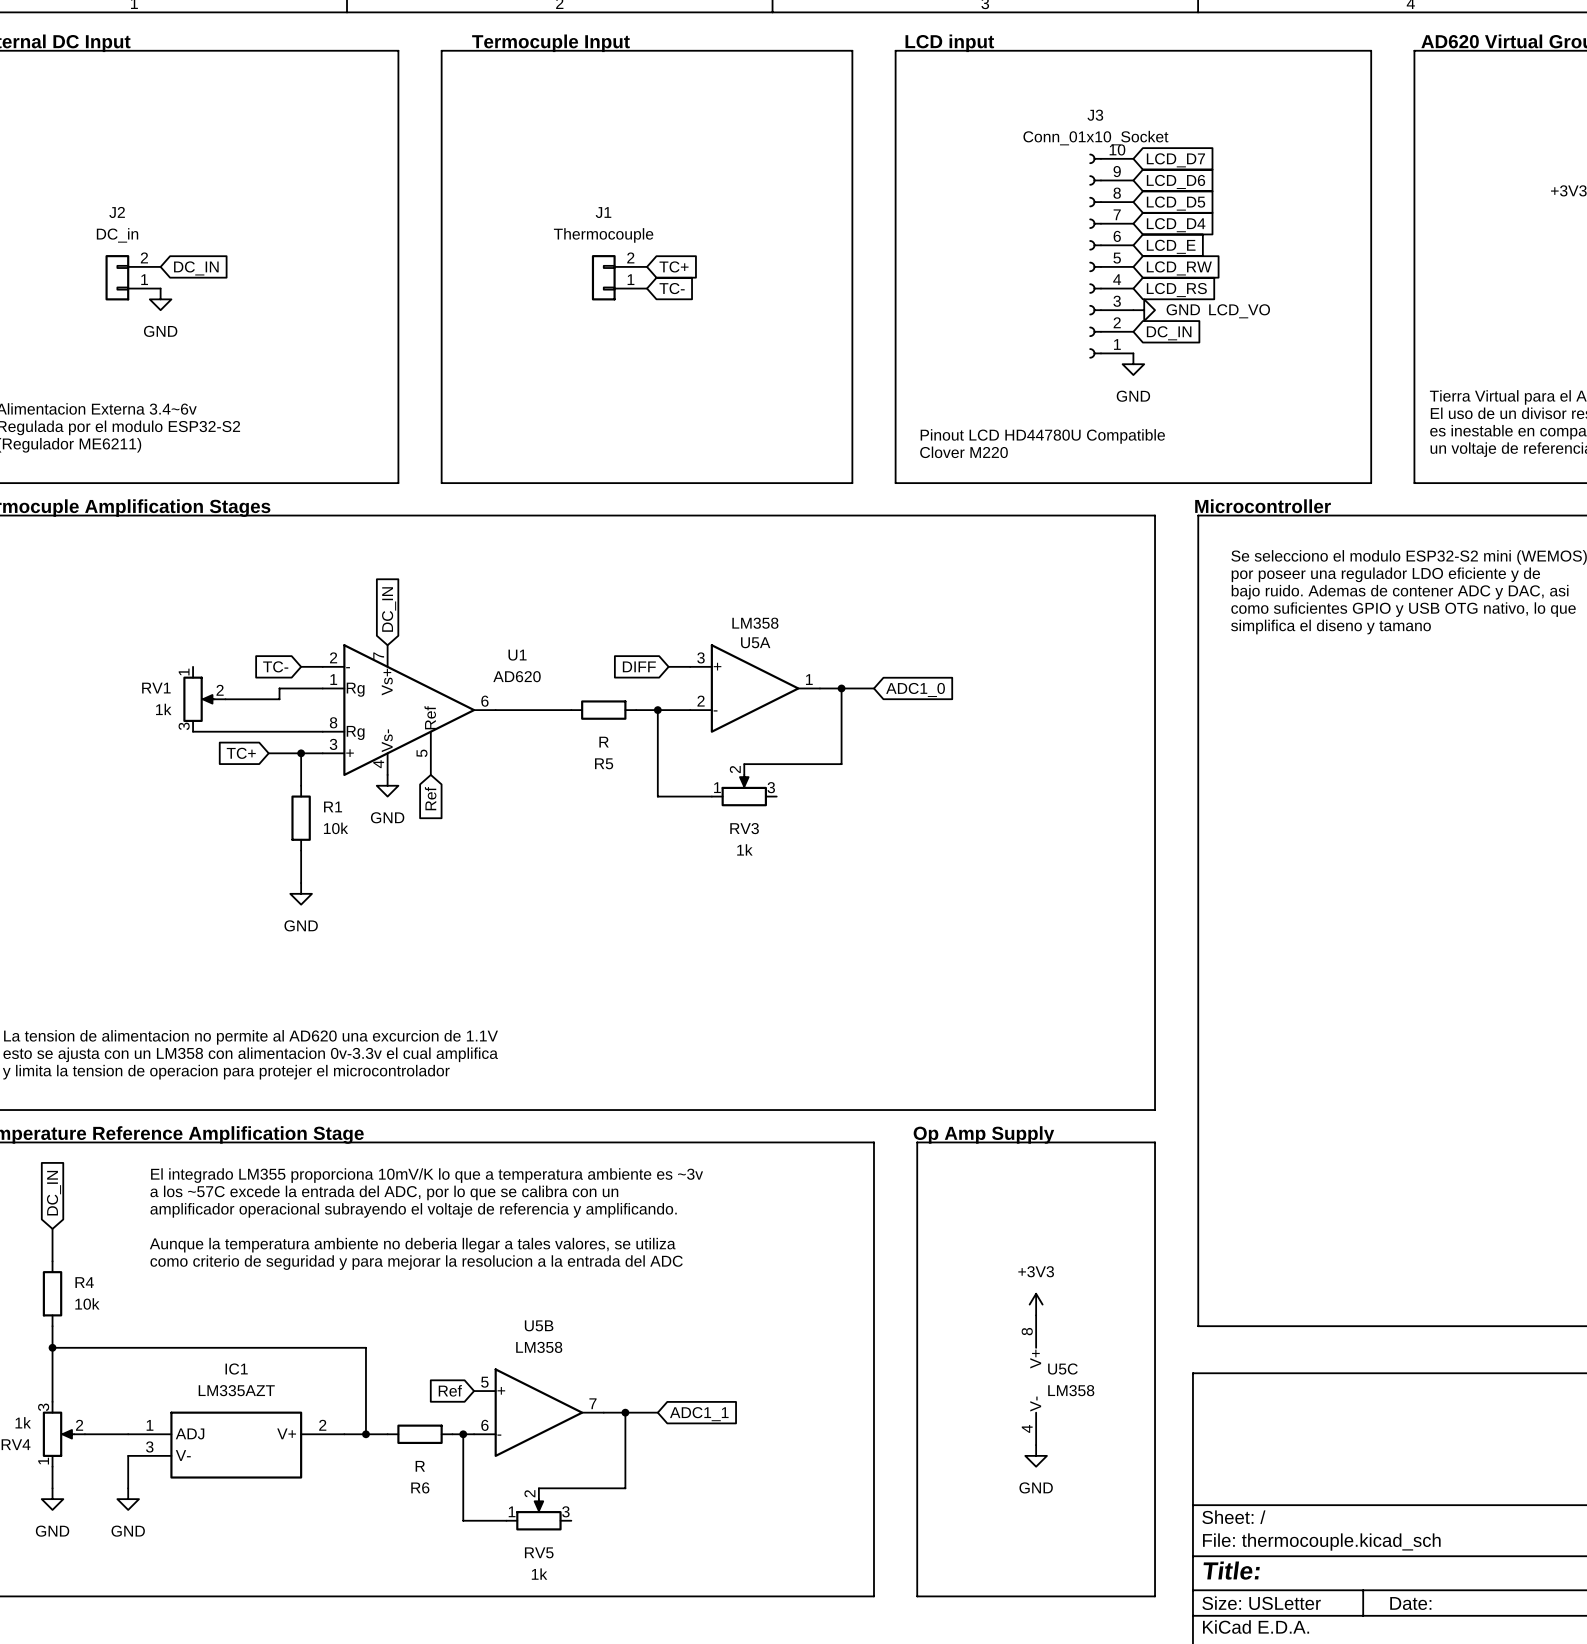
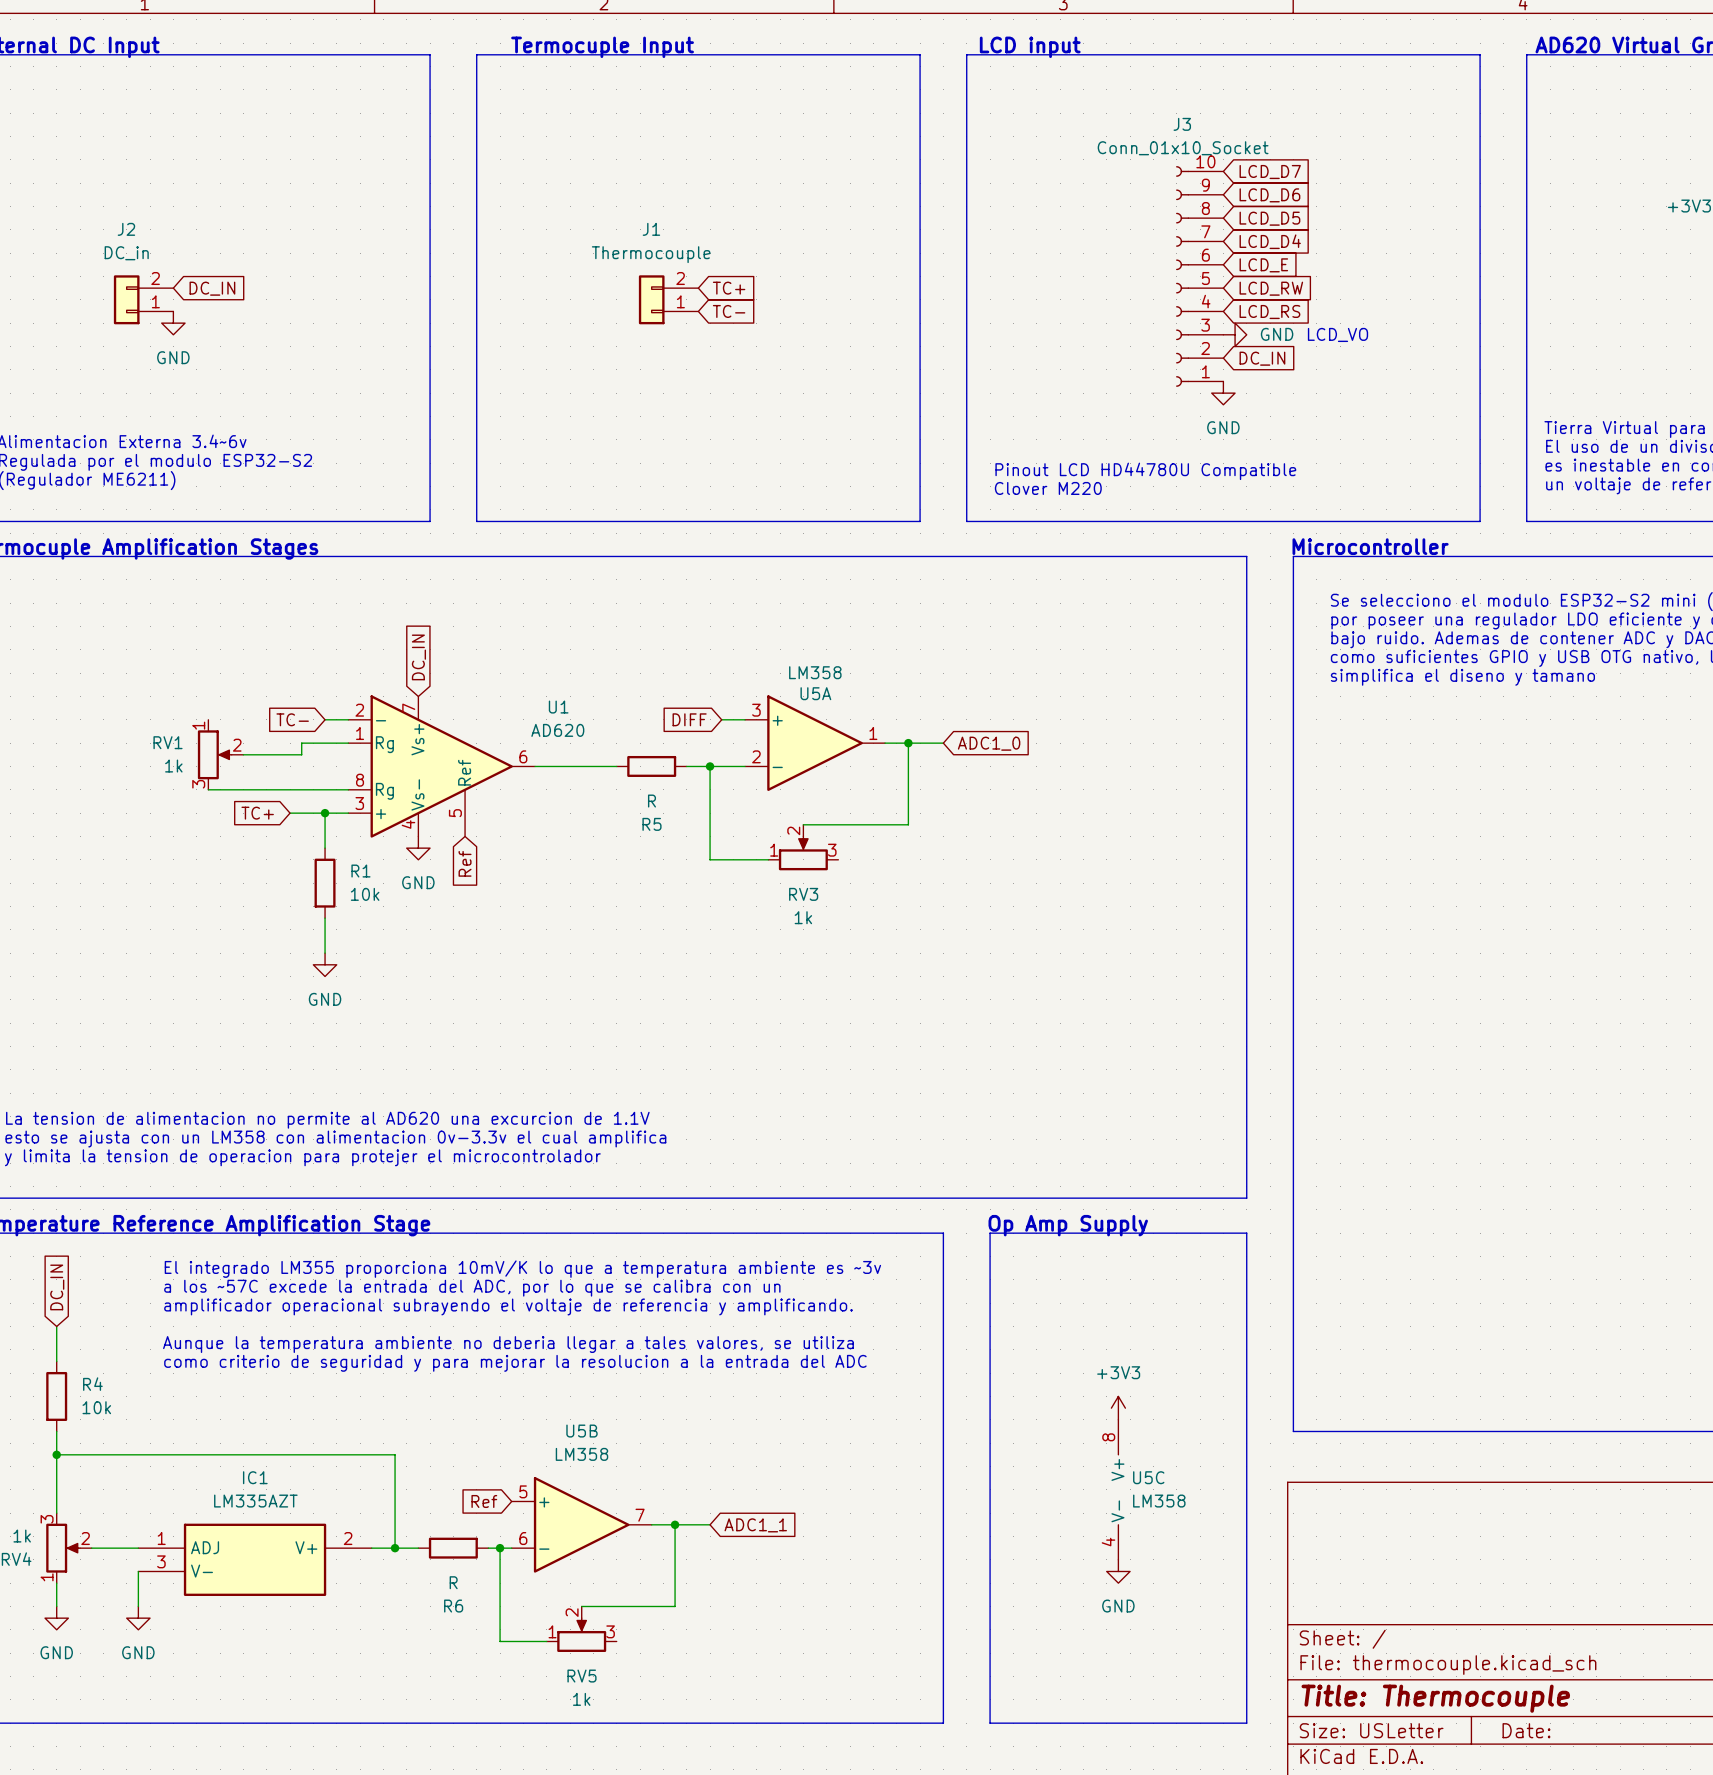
title block: Title: (1231, 1570) -> Title: Thermocouple (1435, 1698)

